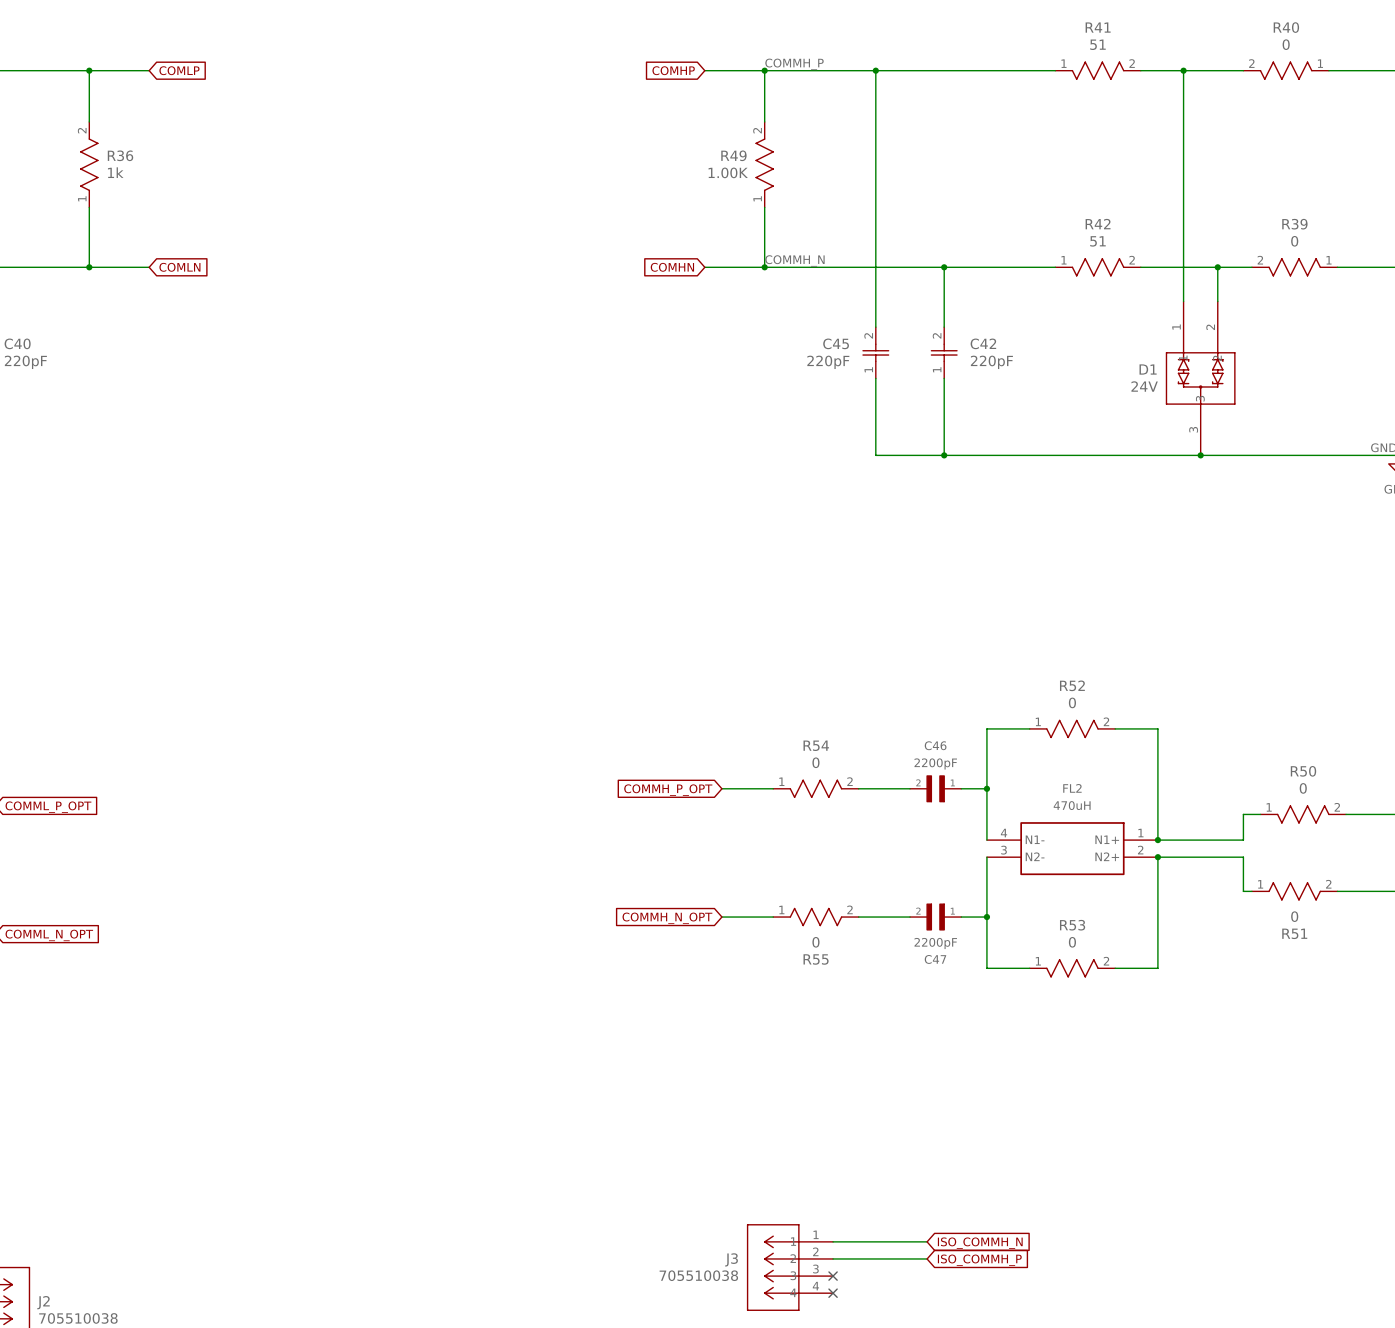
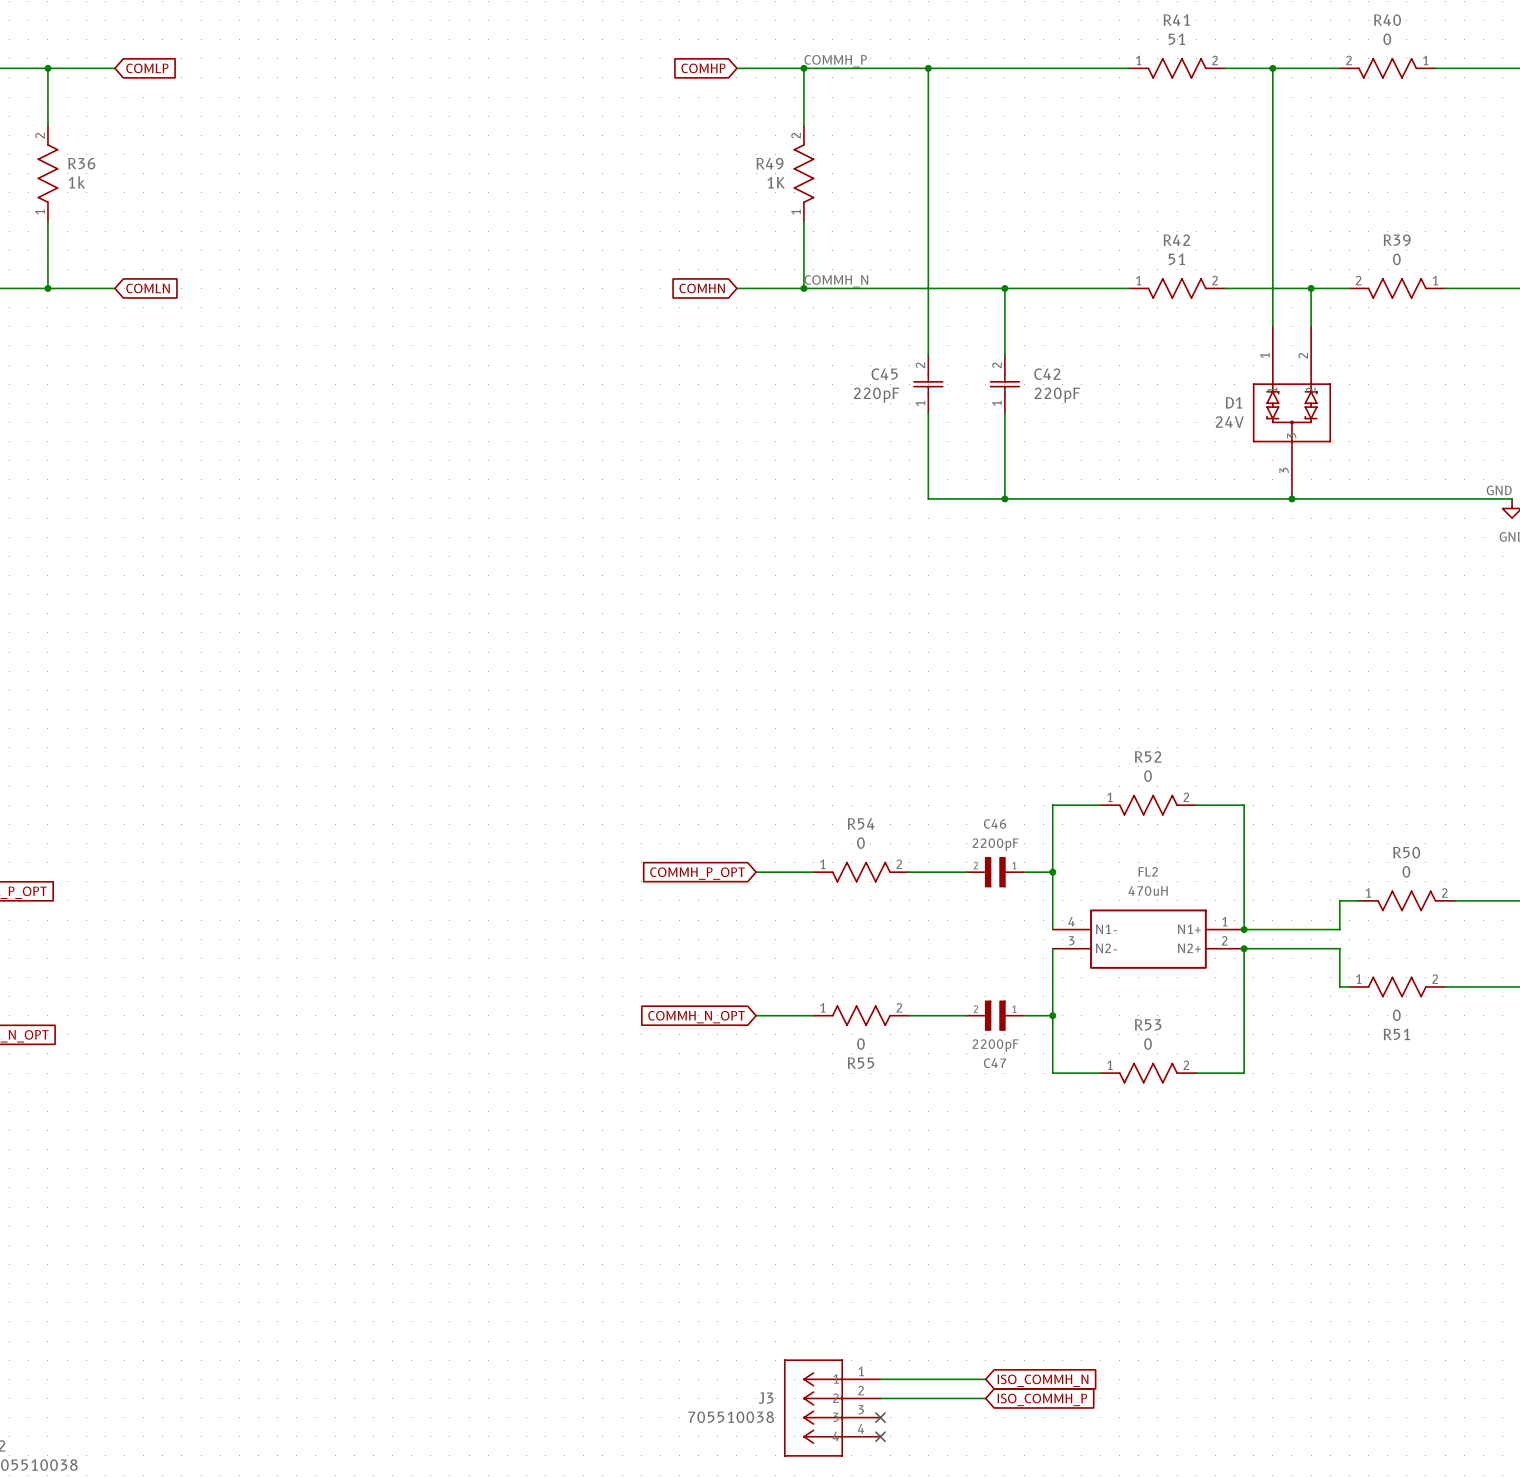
R49 value: 1.00K (728, 172) -> 1K (776, 182)

